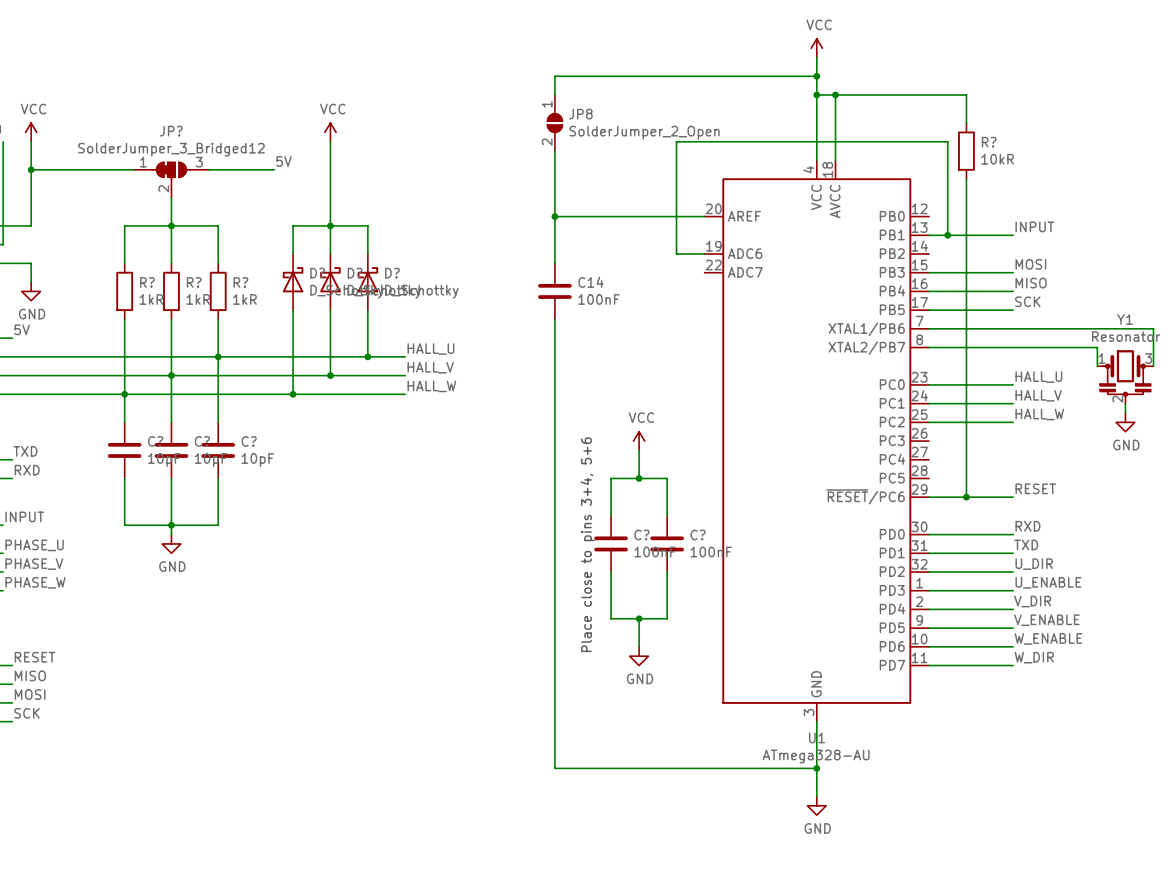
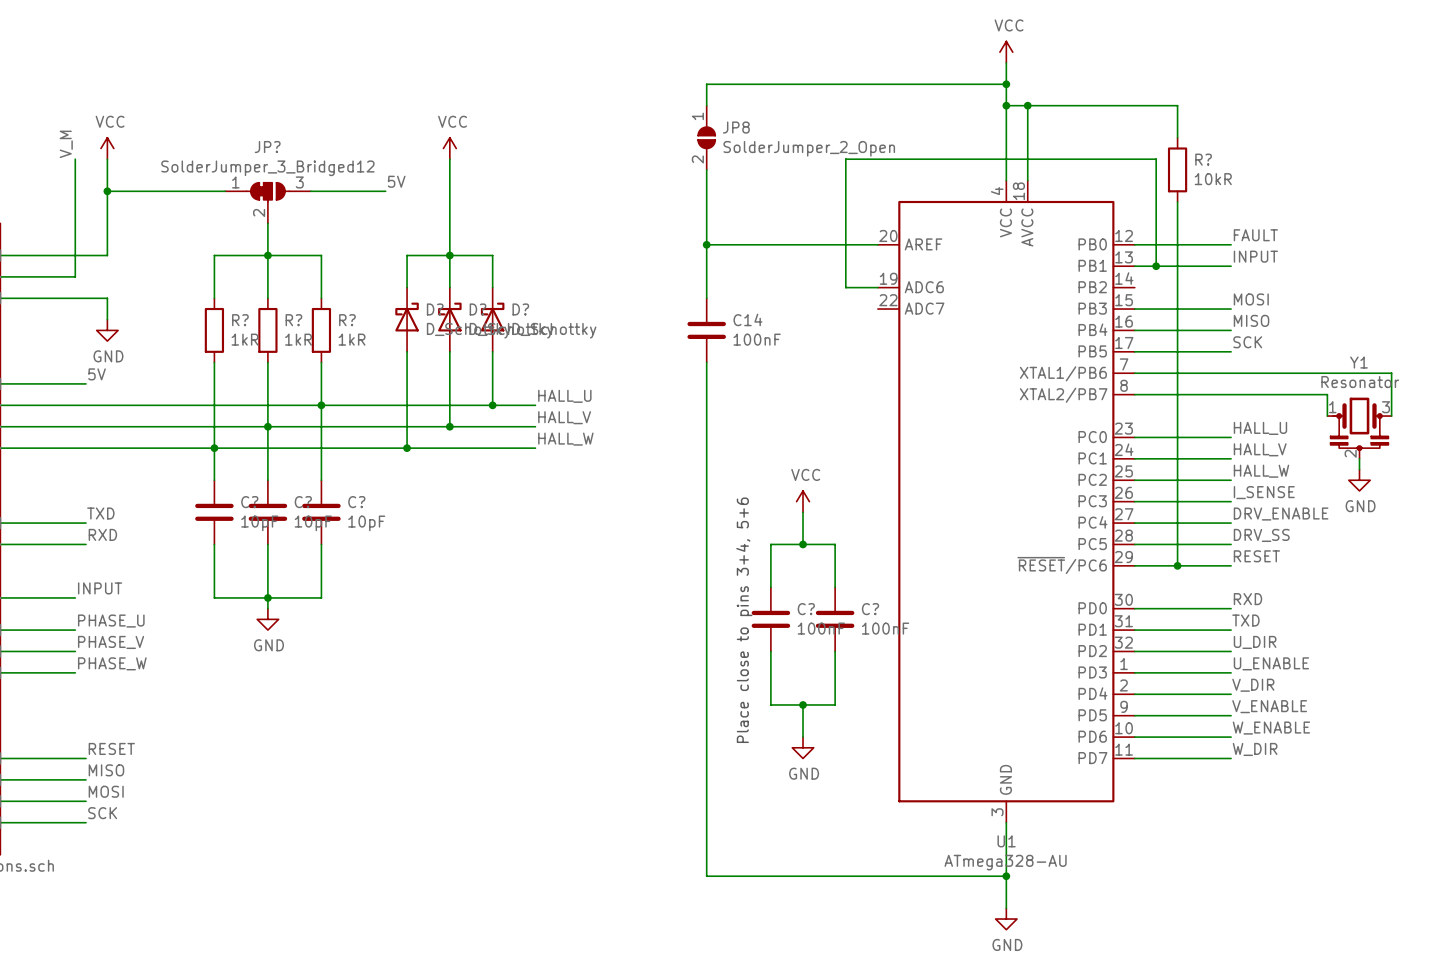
label: none -> FAULT (1255, 235)
wire: none -> (1134, 244) (1231, 244)
label: none -> I_SENSE (1264, 492)
wire: none -> (1134, 501) (1231, 501)
label: none -> DRV_ENABLE (1281, 514)
wire: none -> (1134, 523) (1231, 523)
label: none -> DRV_SS (1261, 535)
wire: none -> (1134, 544) (1231, 544)

